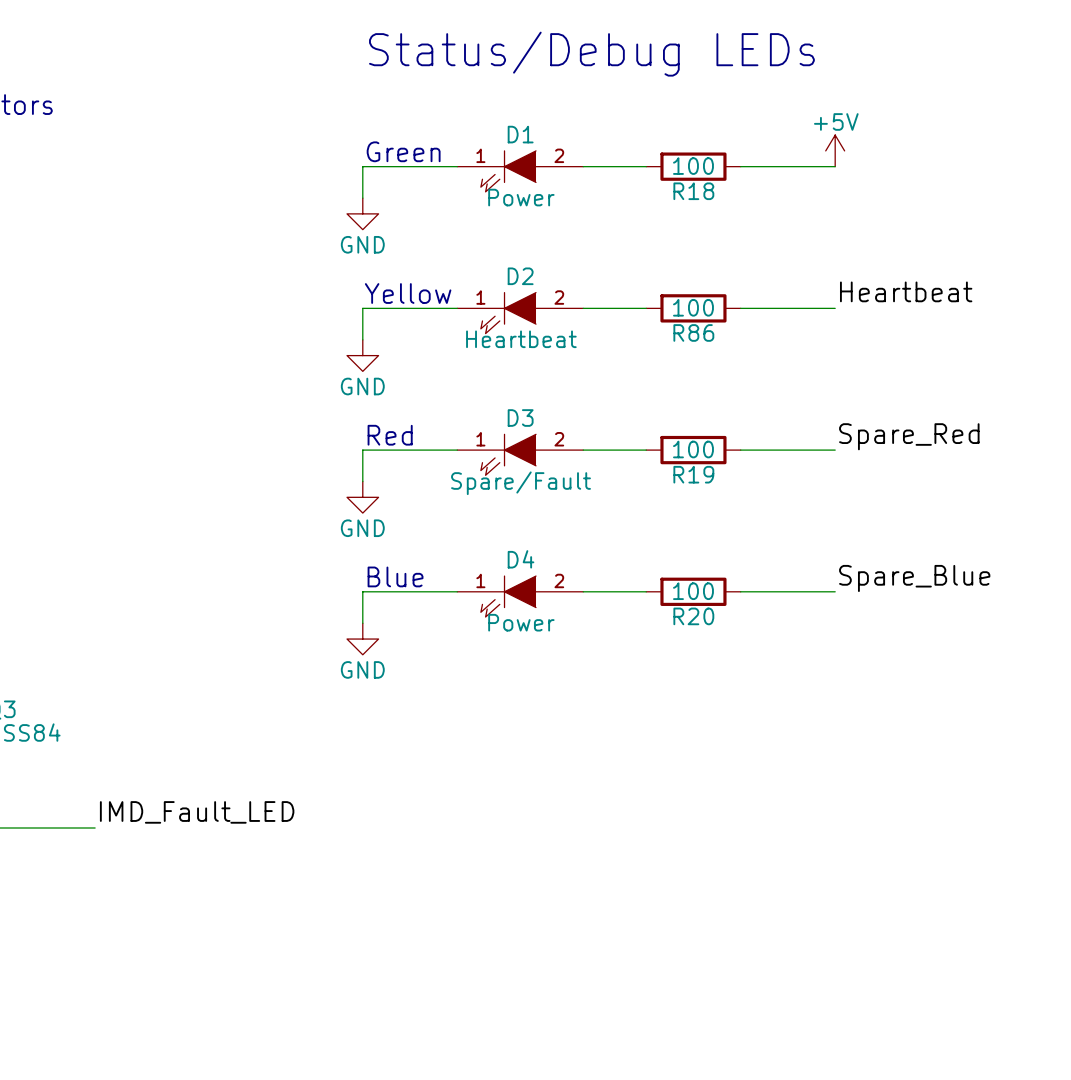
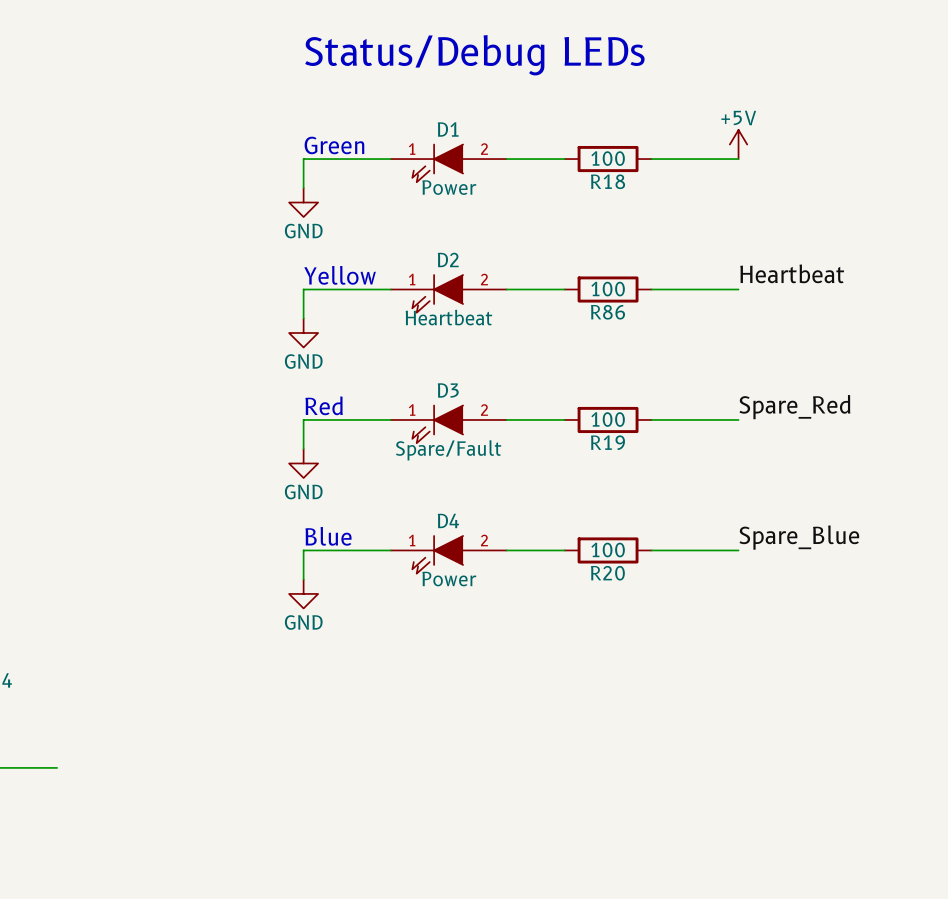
label: IMD_Fault_LED (197, 812) -> none

